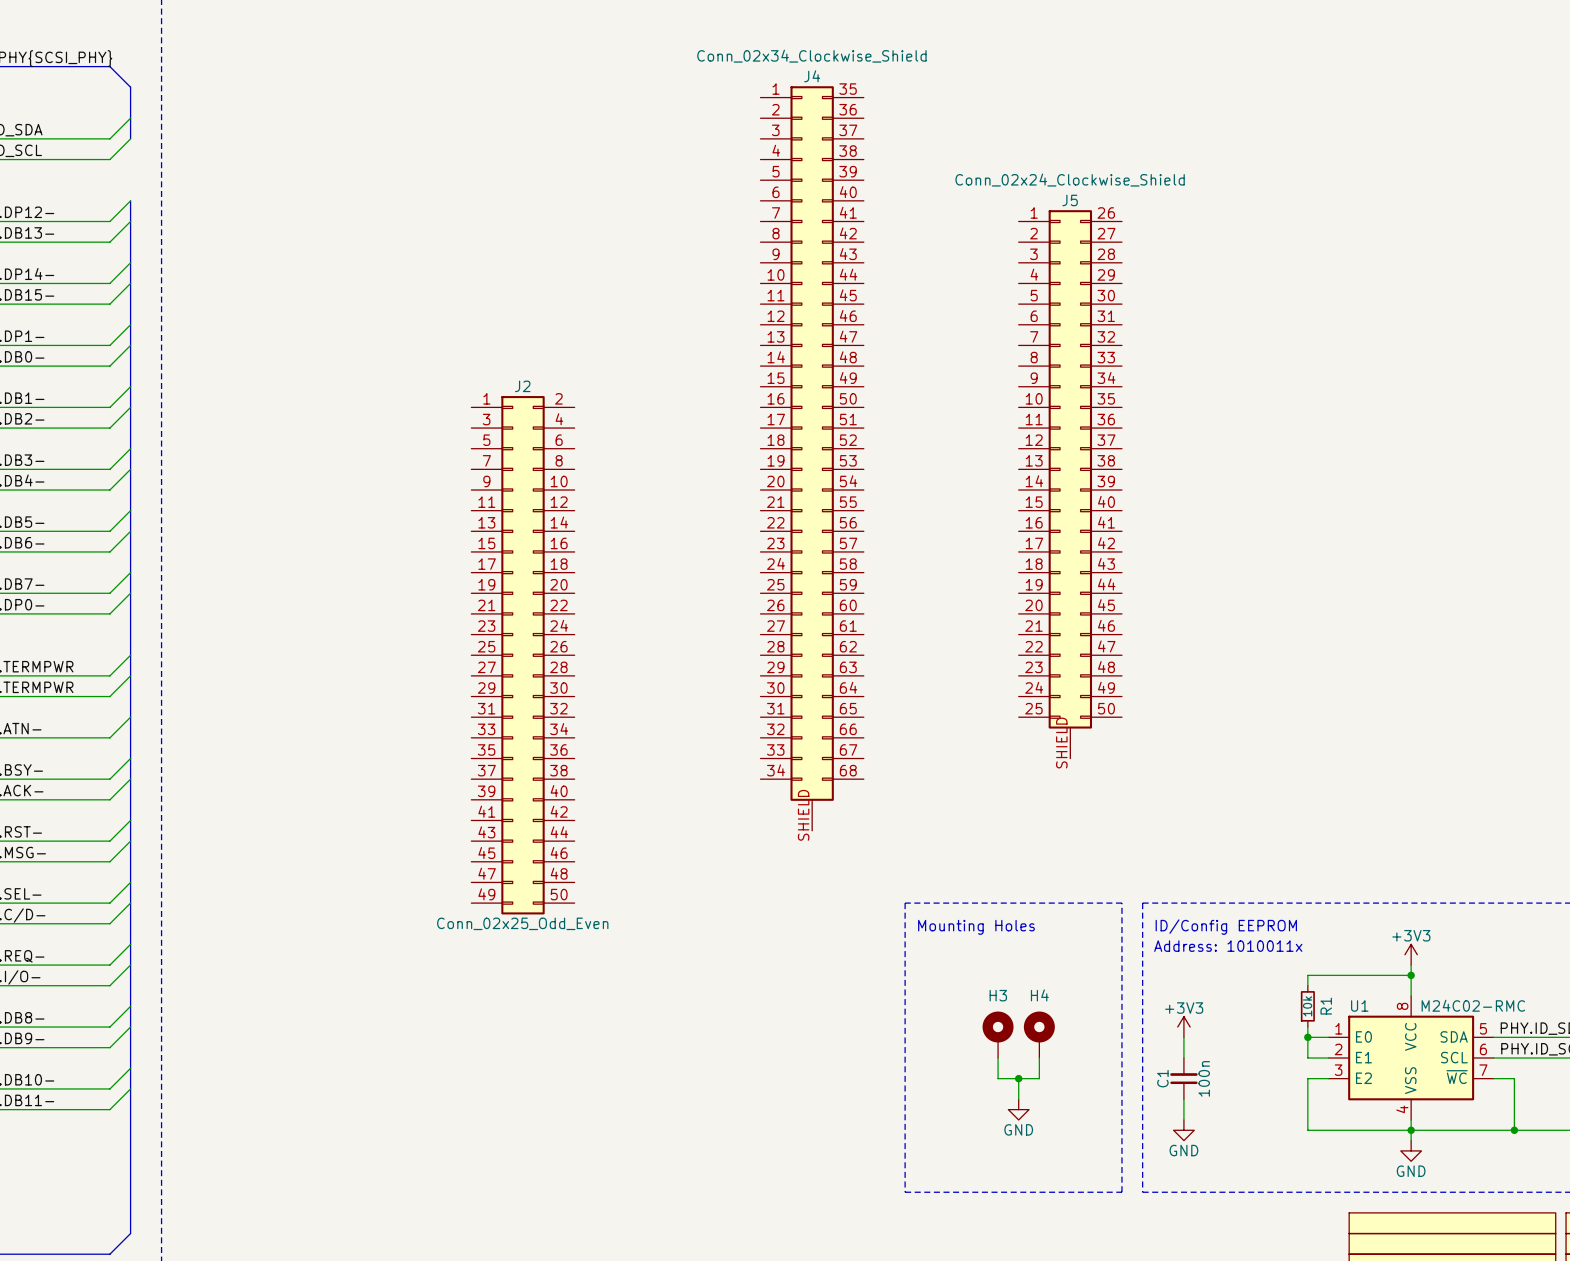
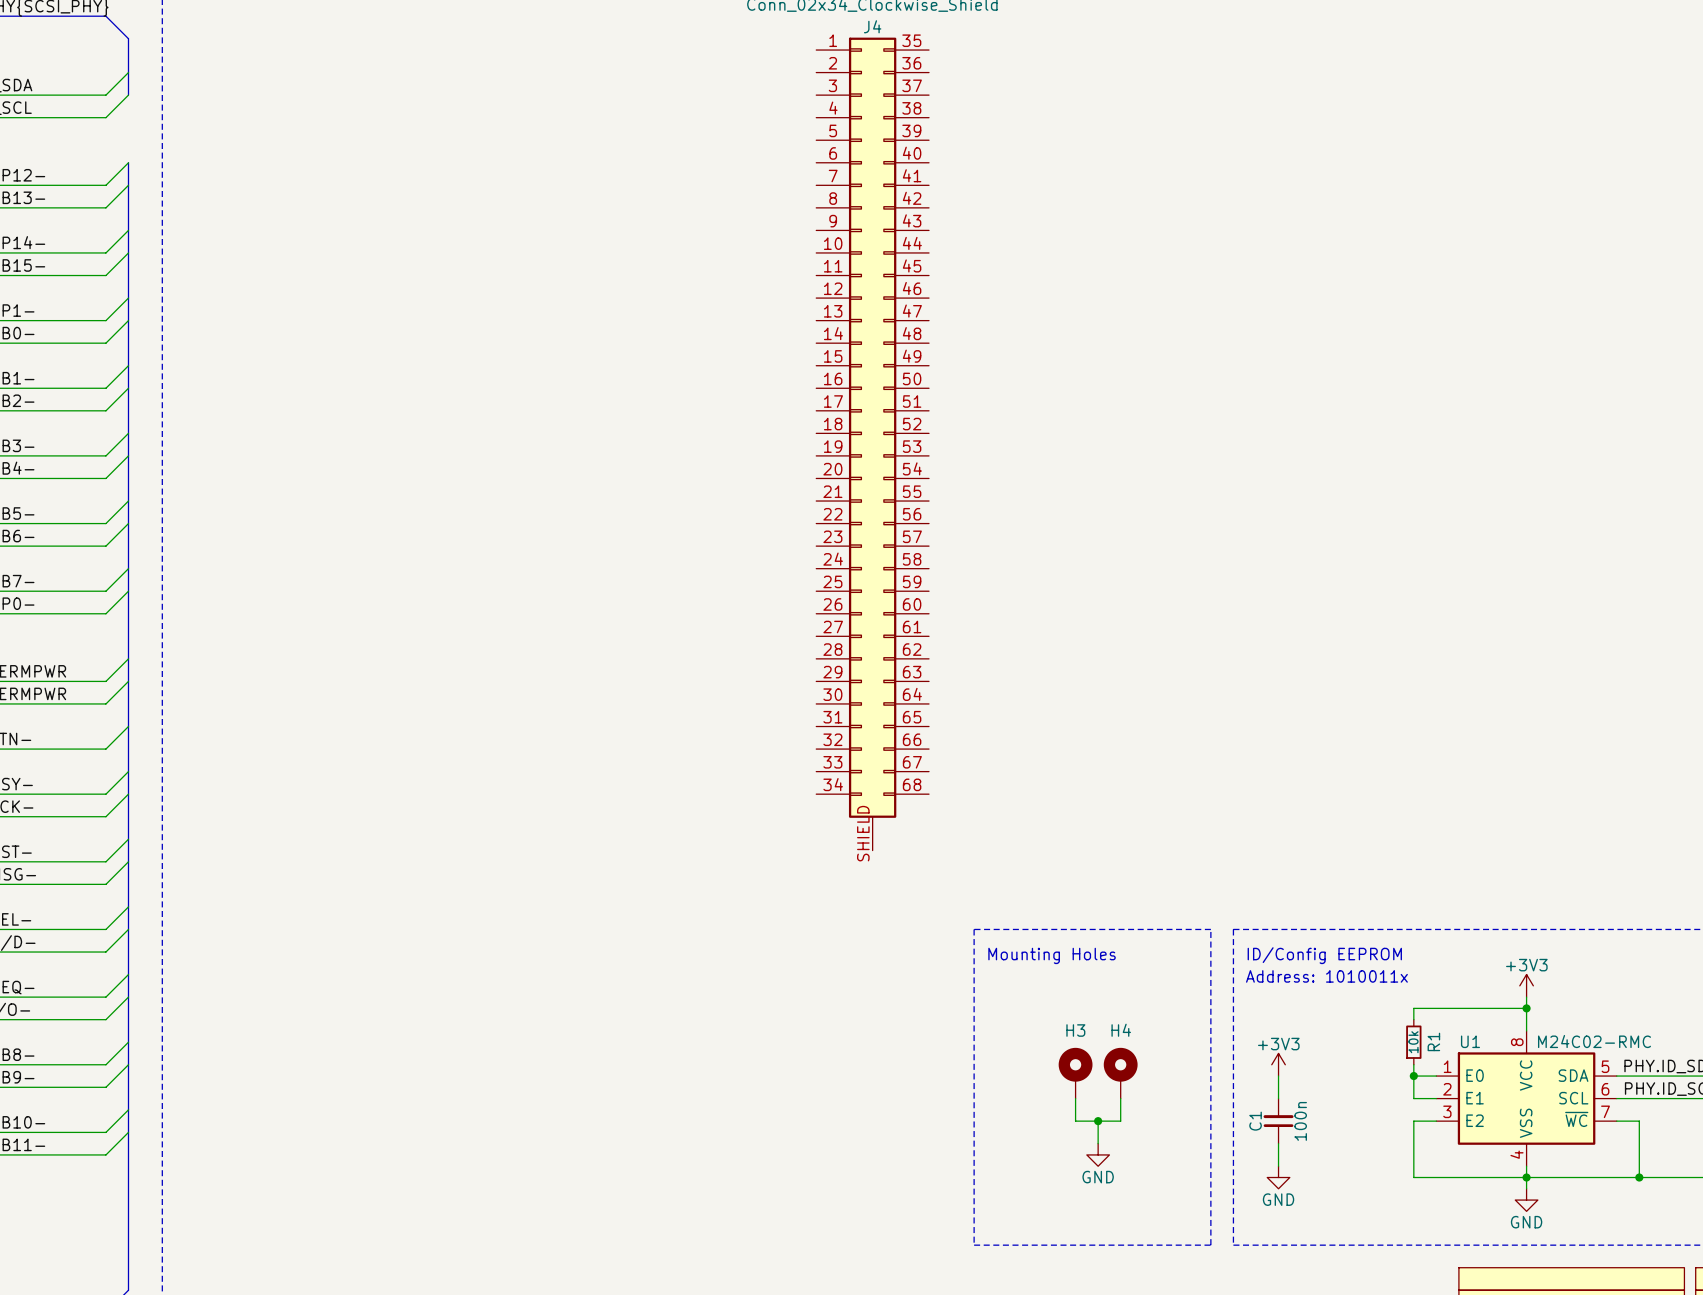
J5: Conn_02x24_Clockwise_Shield (1070, 484) -> none
J2: Conn_02x25_Odd_Even (523, 655) -> none

